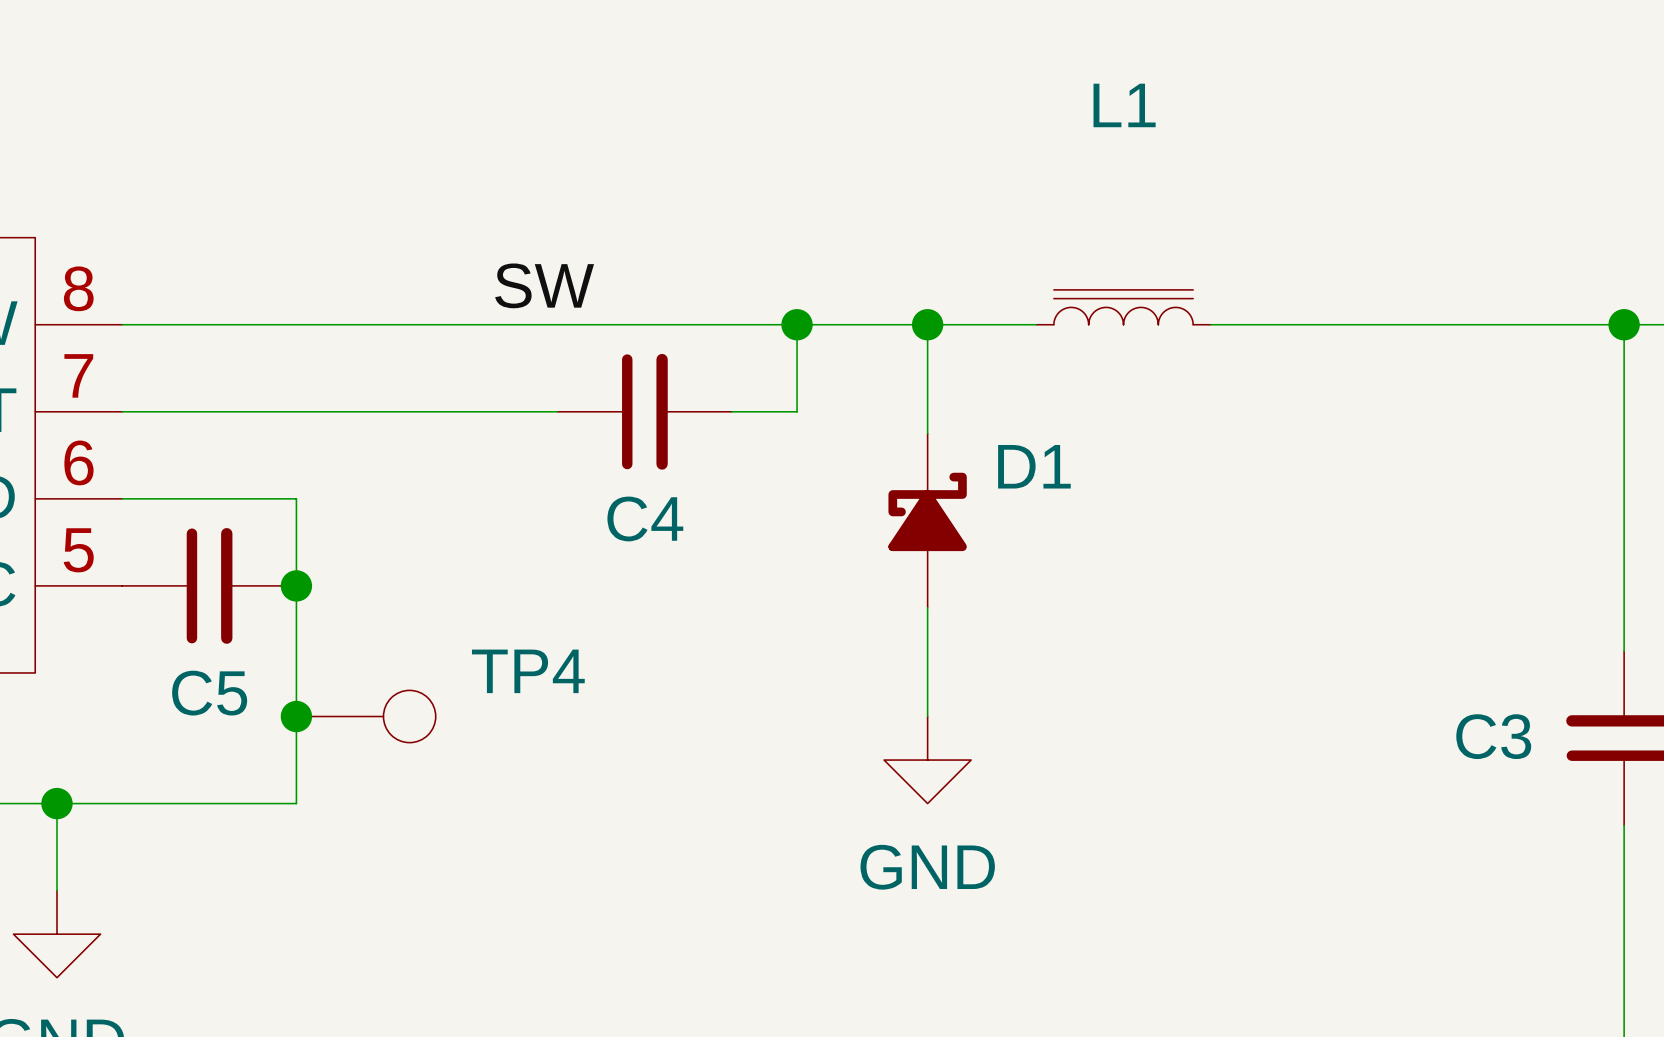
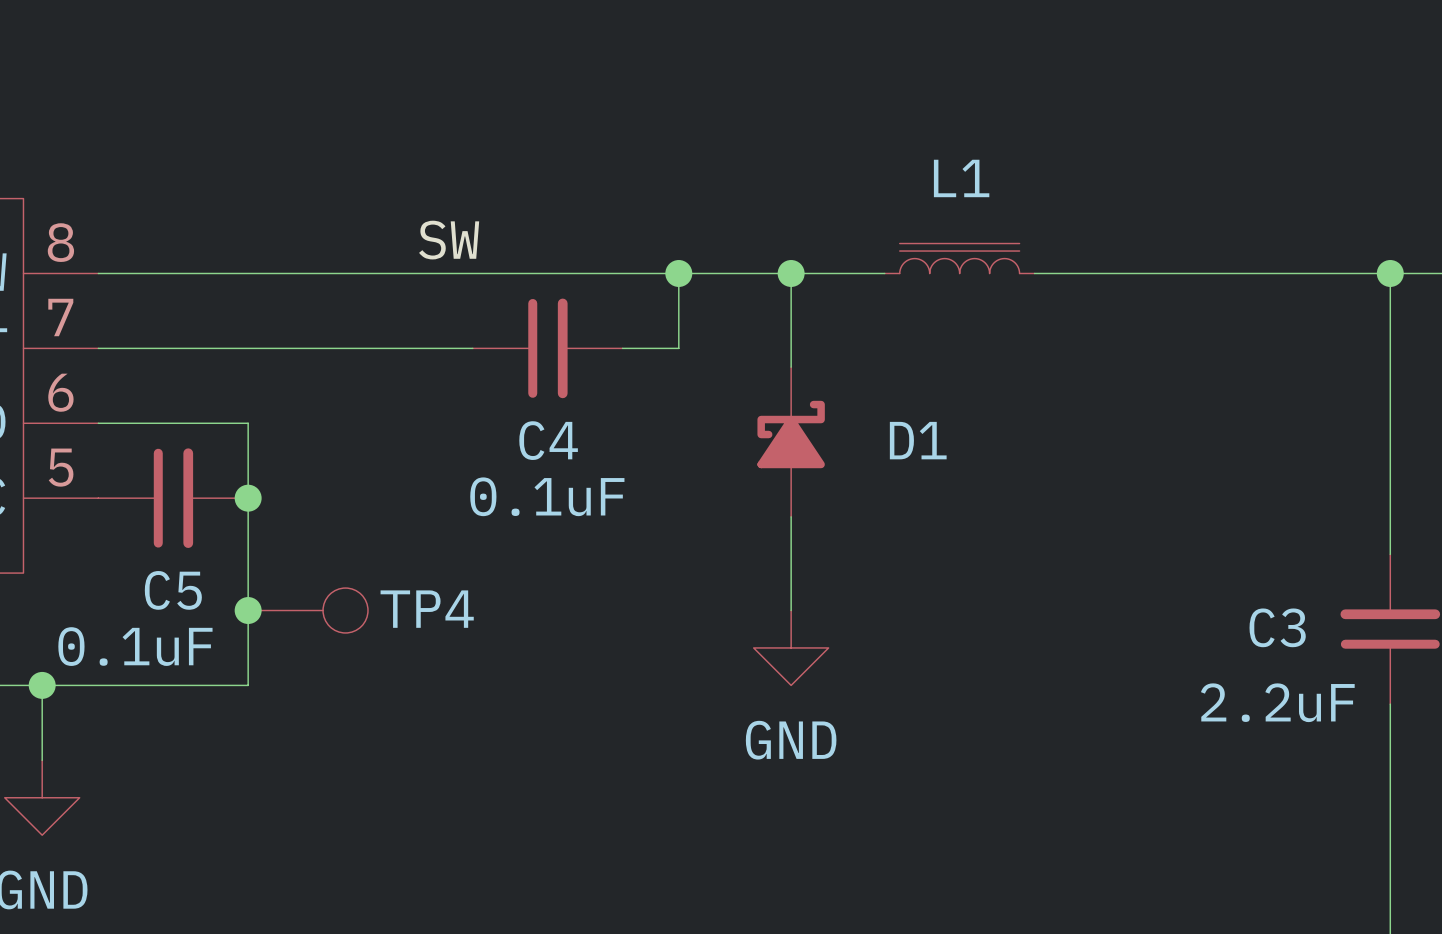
L1 name position: L1 (1124, 105) -> L1 (961, 178)
D1 name position: D1 (1034, 466) -> D1 (918, 440)
C4 value: none -> 0.1uF (547, 496)
TP4 name position: TP4 (528, 671) -> TP4 (427, 609)
C5 value: none -> 0.1uF (135, 646)
C3 value: none -> 2.2uF (1277, 702)

